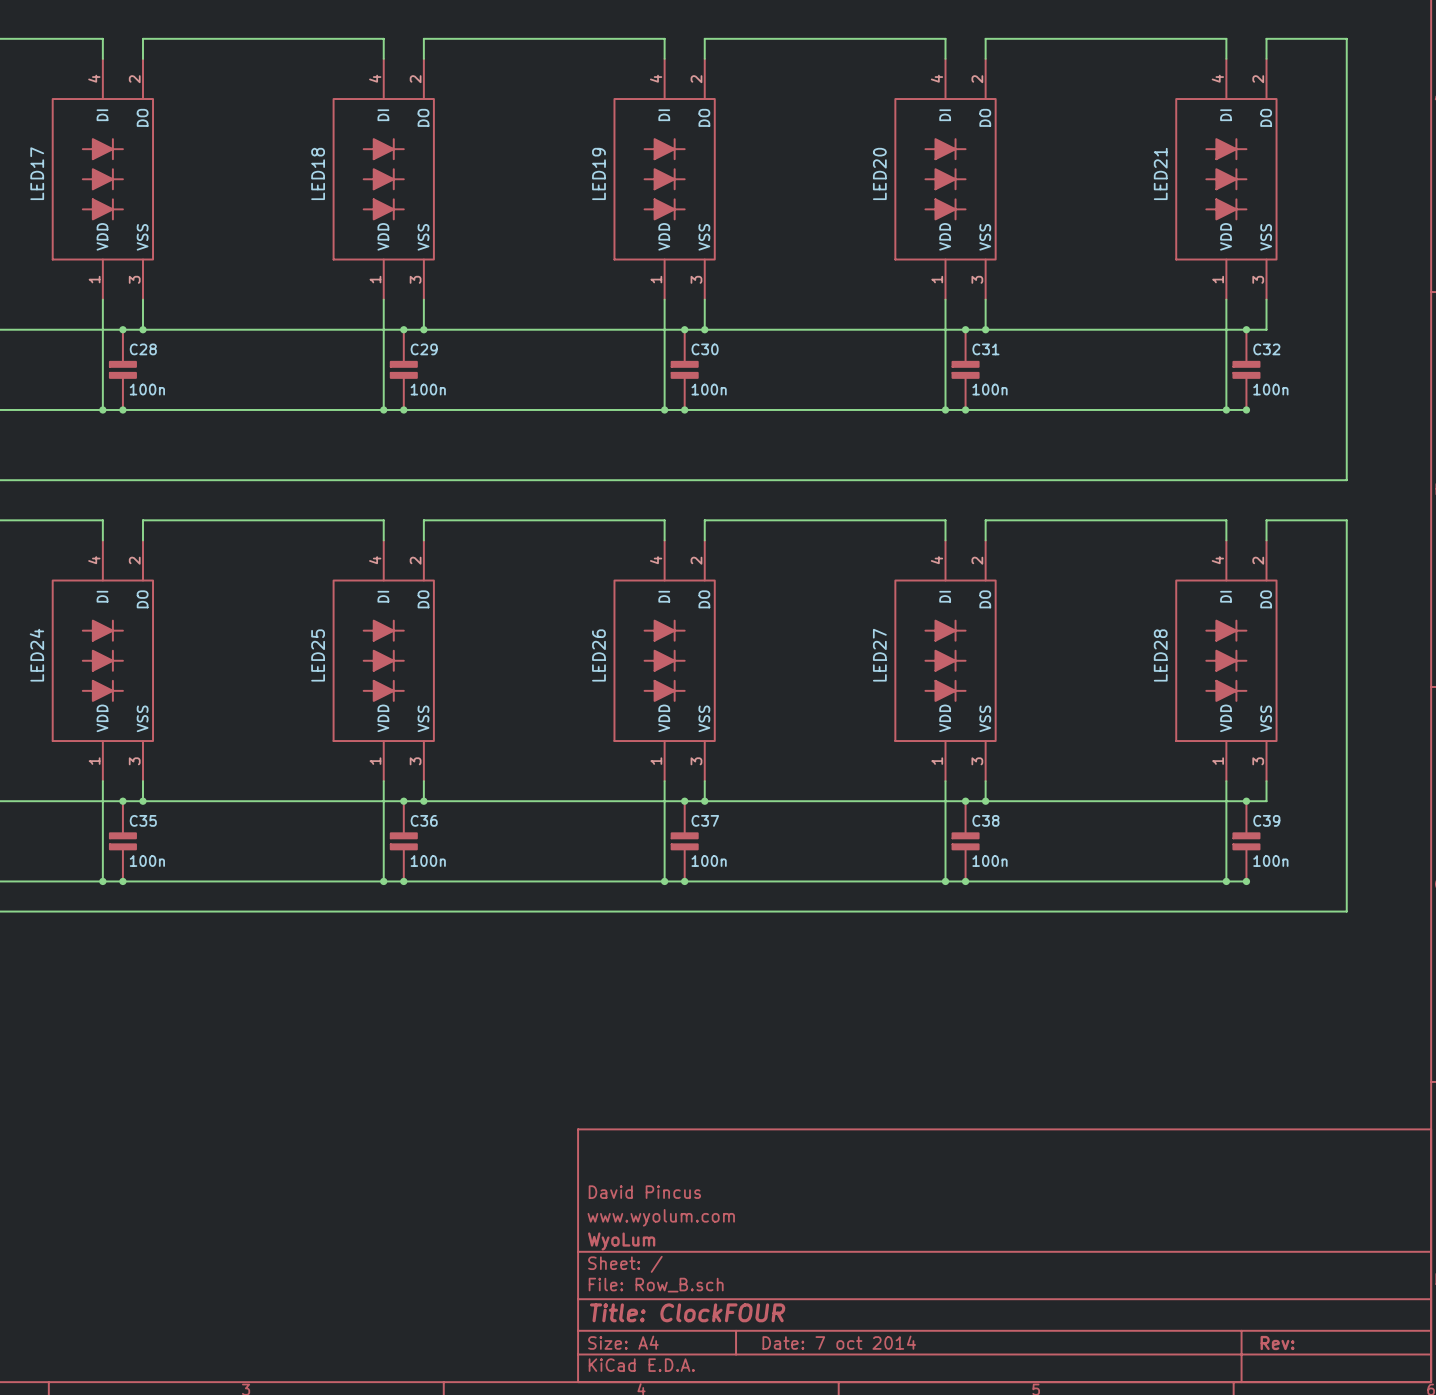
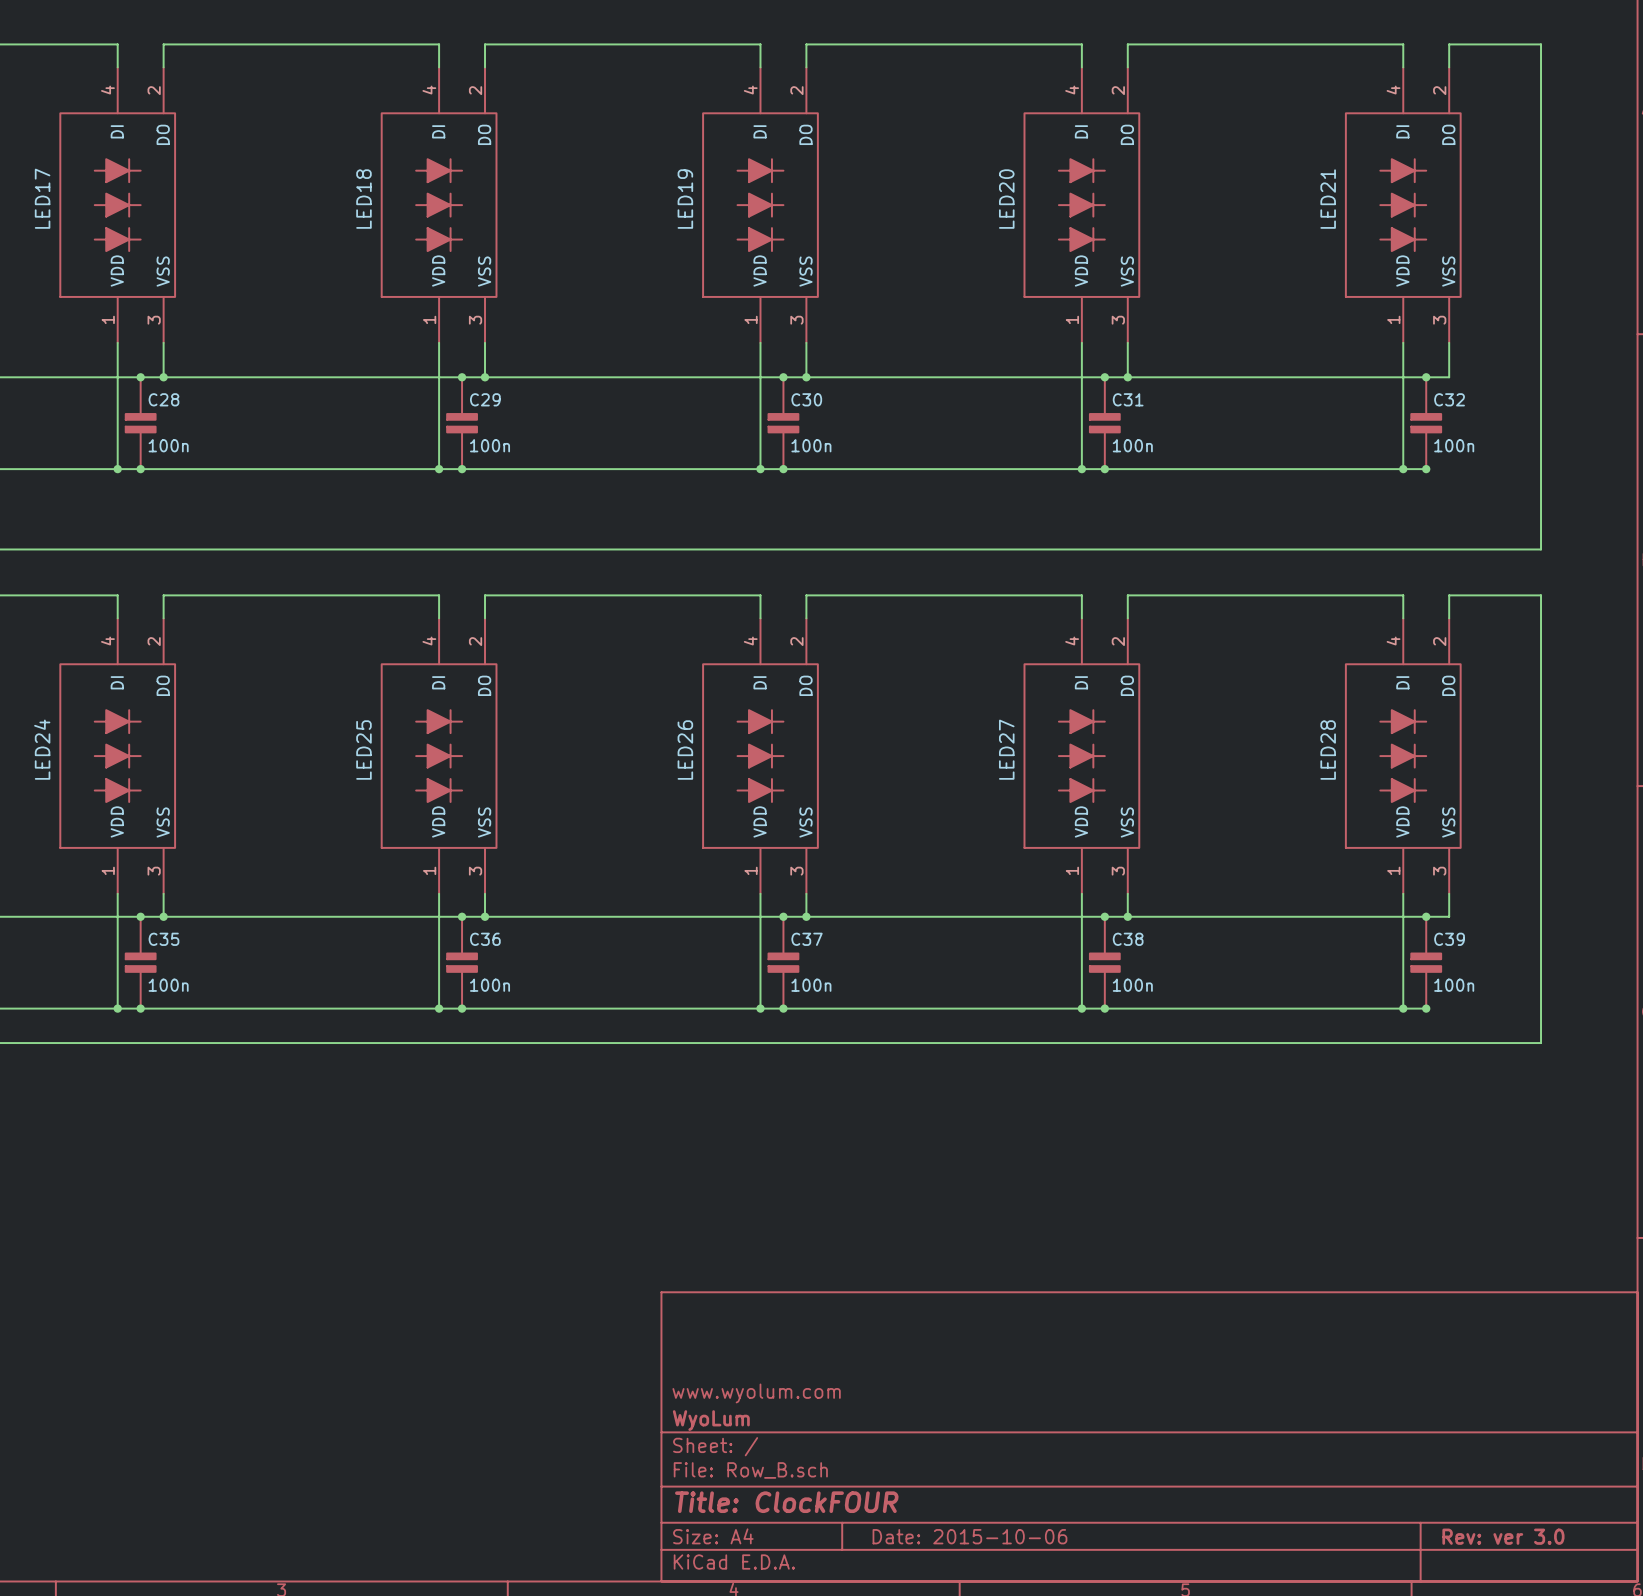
title block: David Pincus (644, 1192) -> none
title block: Date: 7 oct 2014 (839, 1342) -> Date: 2015-10-06 (969, 1536)
title block: Rev: (1277, 1342) -> Rev: ver 3.0 (1503, 1536)

